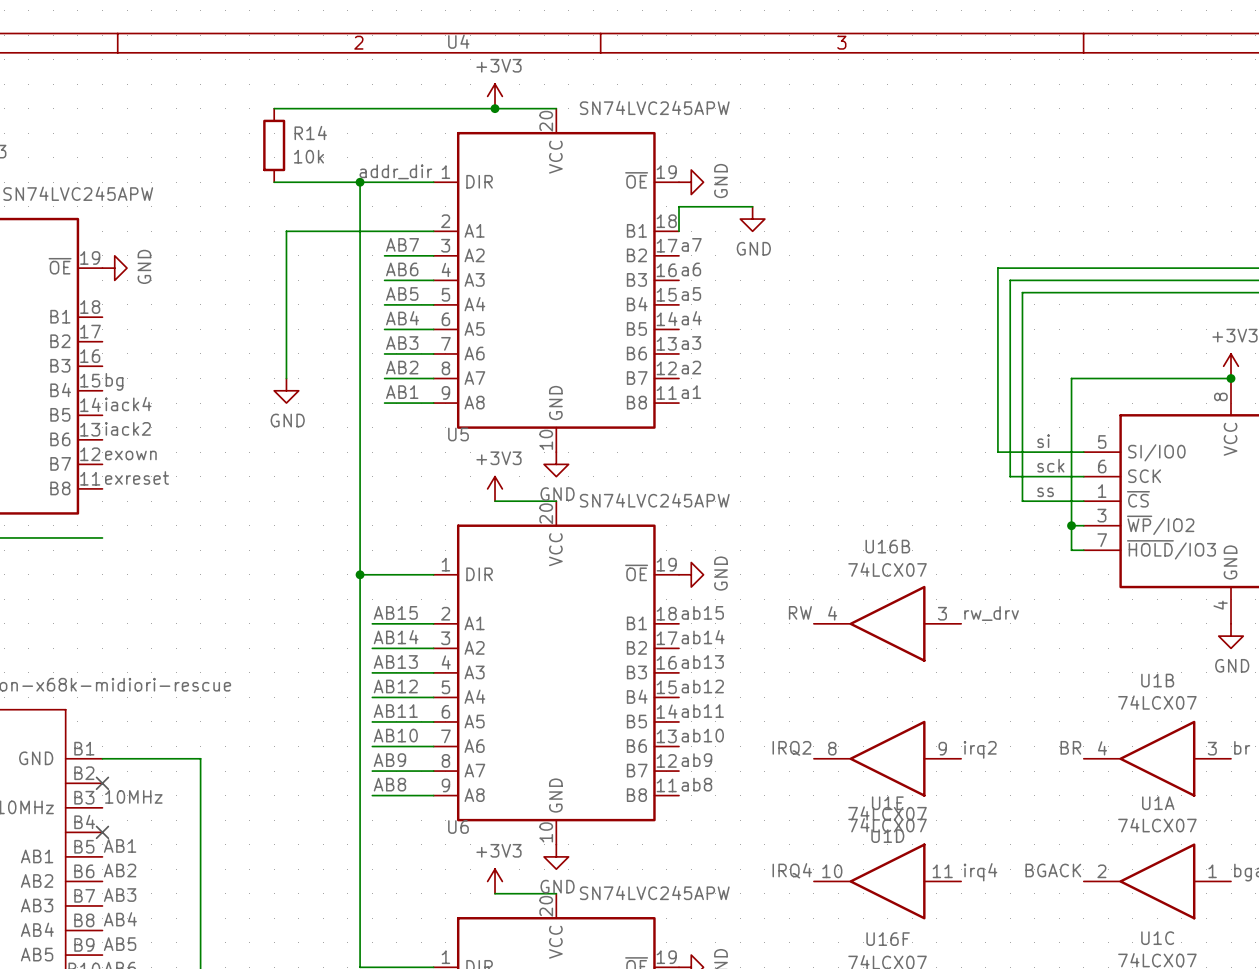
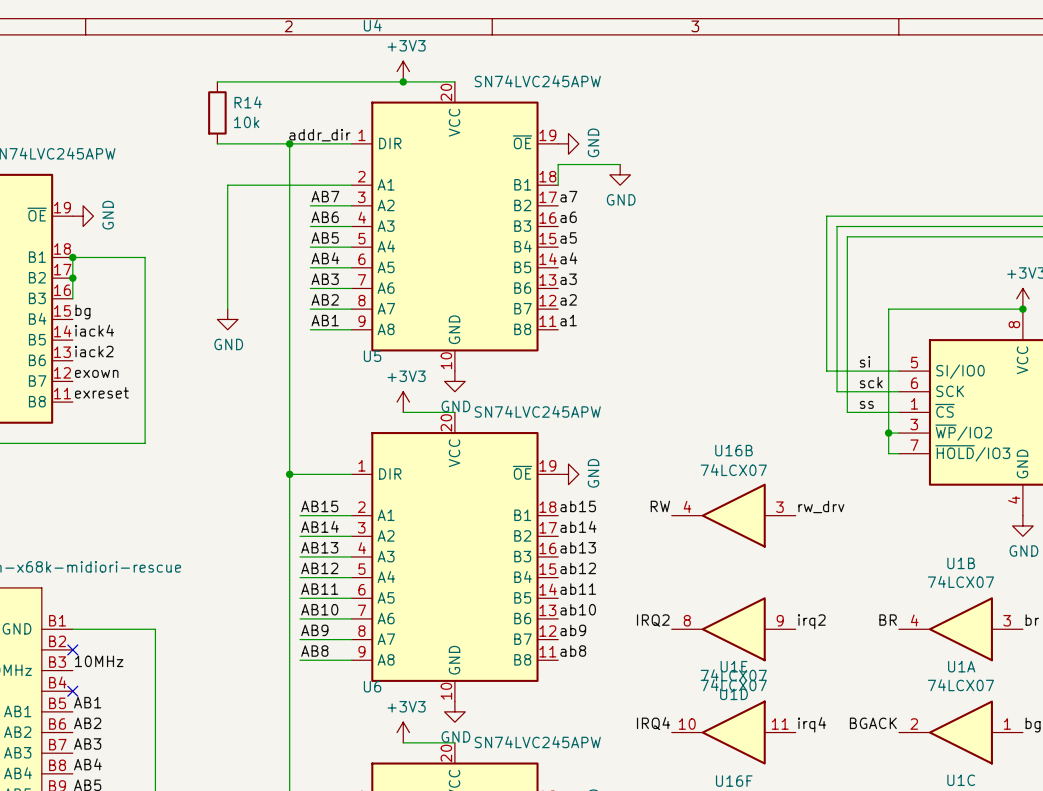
junction: none -> (72, 257)
junction: none -> (72, 278)
wire: none -> (72, 298) (72, 257) (145, 257) (145, 443) (72, 443)

